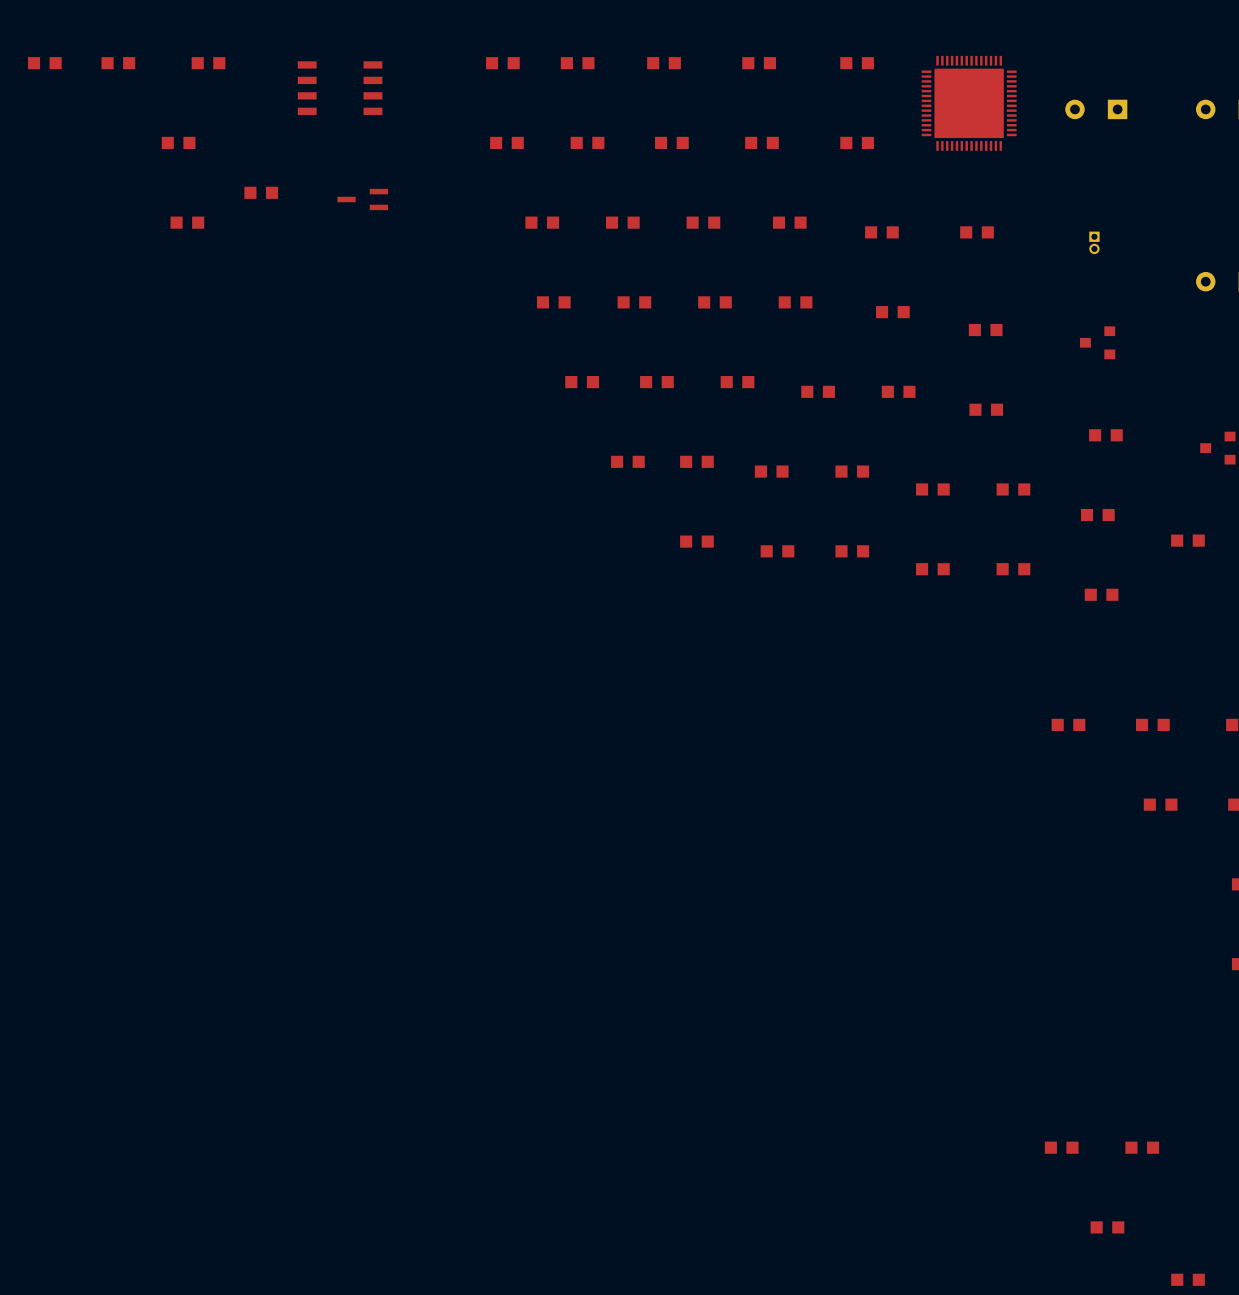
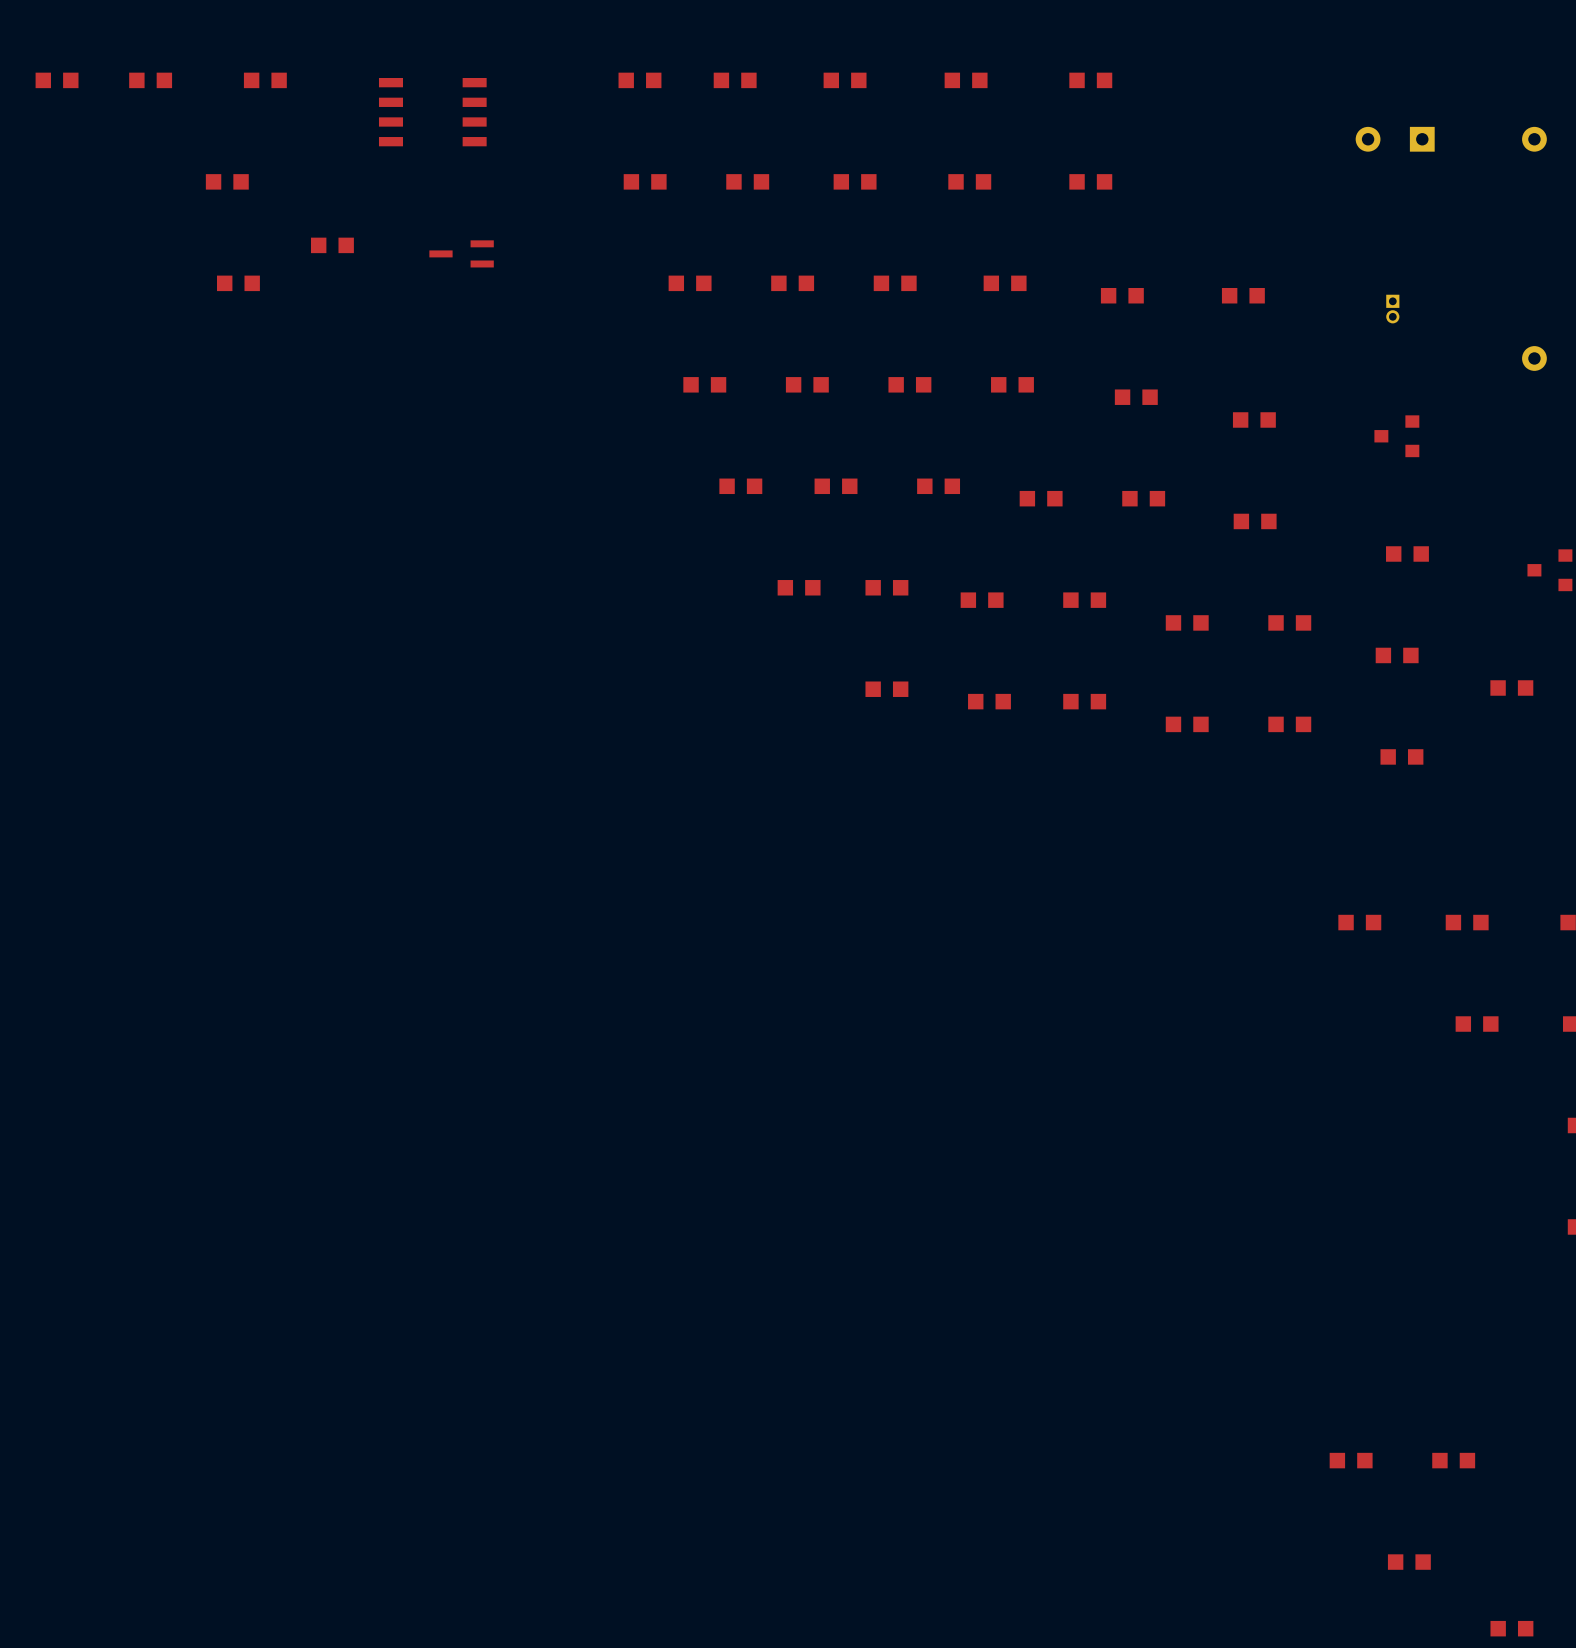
part: (969, 103) -> none

